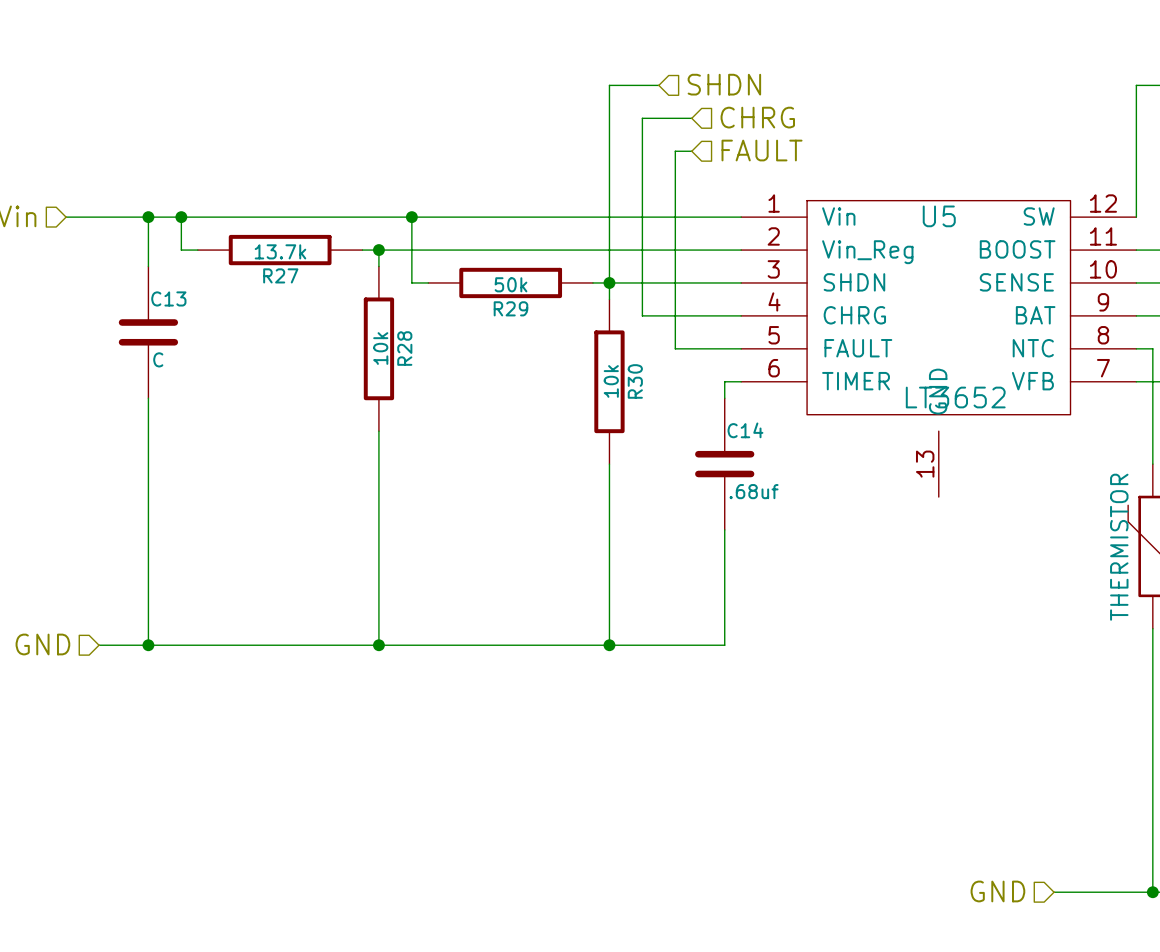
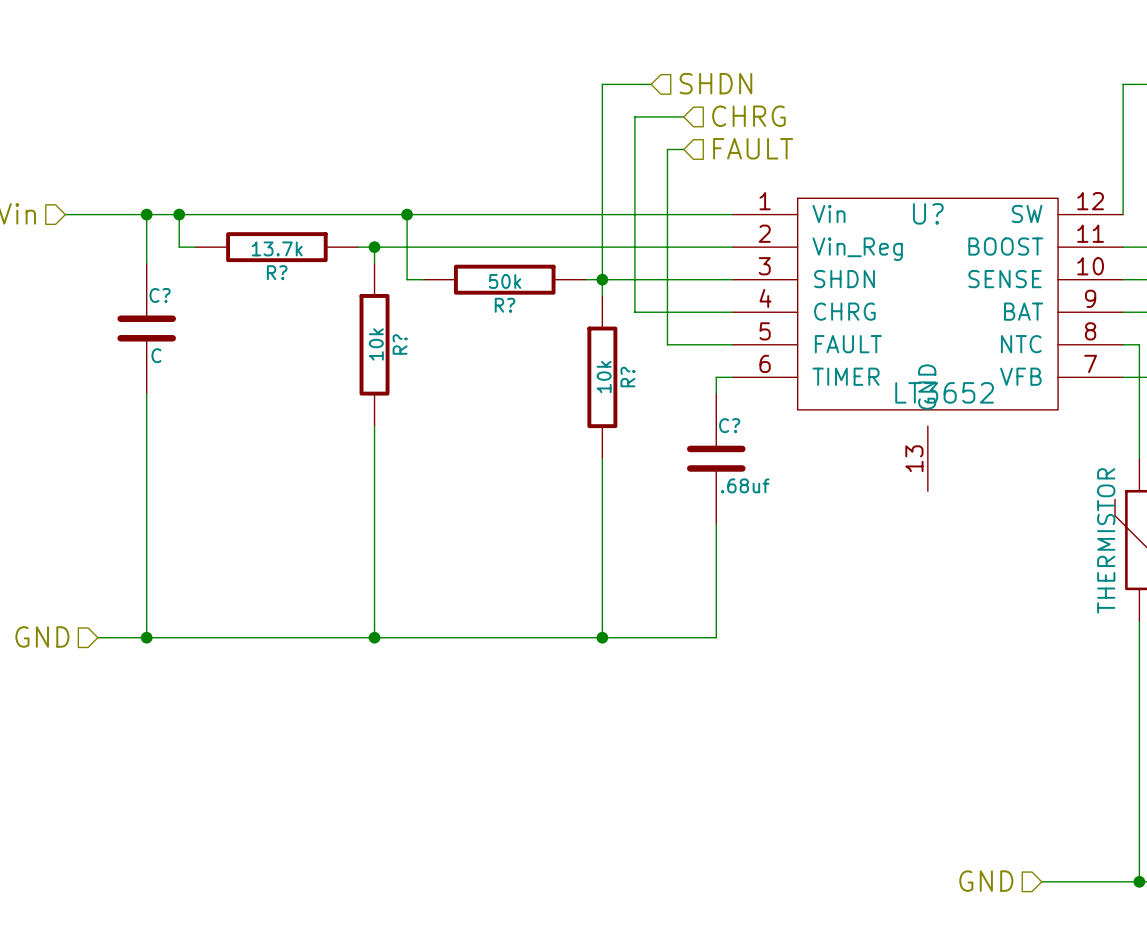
U5 name: U5 (939, 216) -> U? (928, 213)
R27 name: R27 (280, 275) -> R? (277, 272)
C13 name: C13 (168, 298) -> C? (160, 295)
R29 name: R29 (510, 308) -> R? (505, 305)
R28 name: R28 (404, 348) -> R? (400, 344)
R30 name: R30 (635, 381) -> R? (627, 377)
C14 name: C14 (745, 430) -> C? (729, 425)

